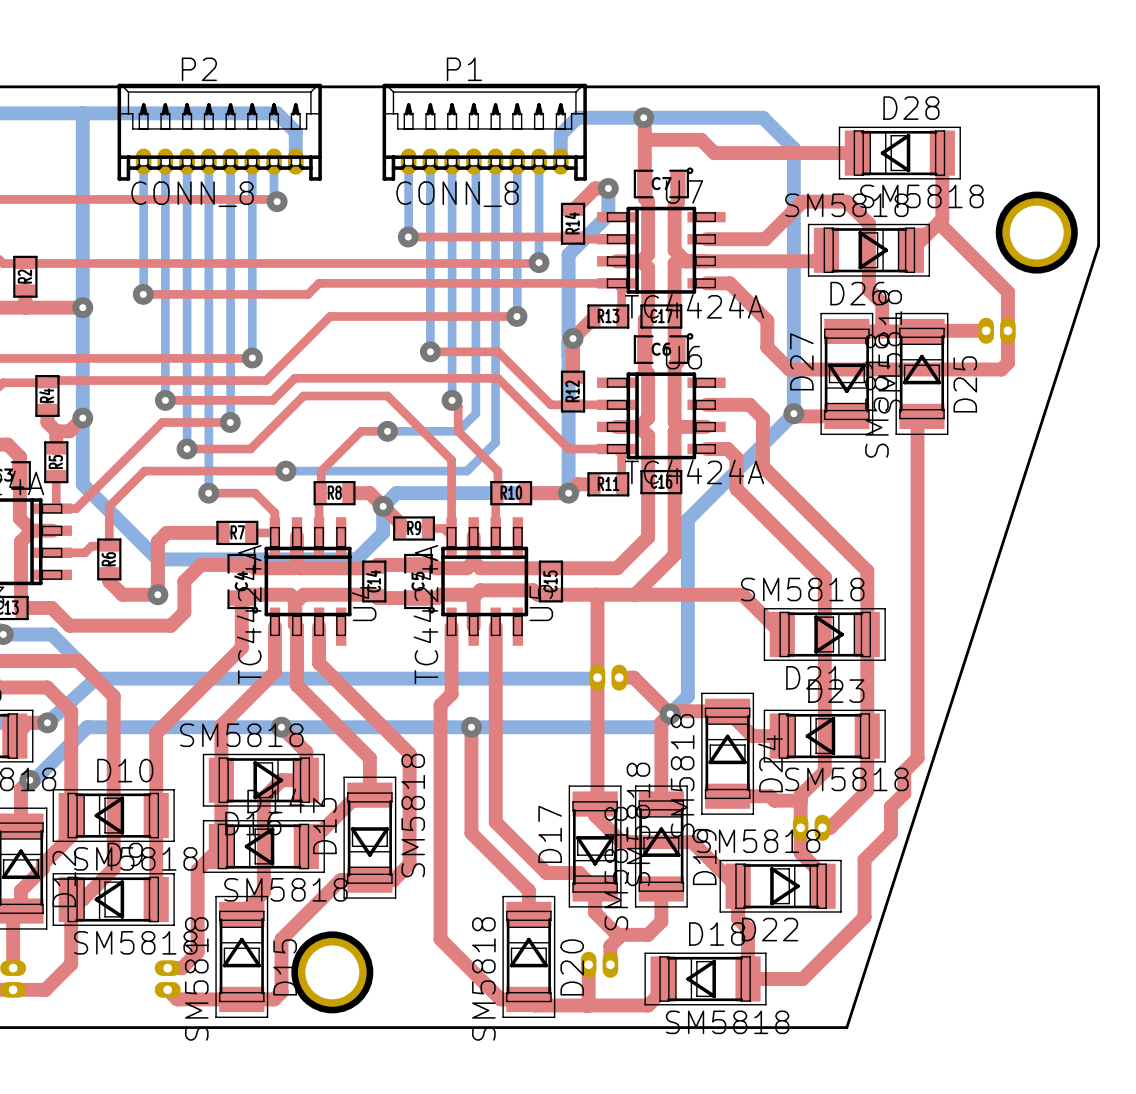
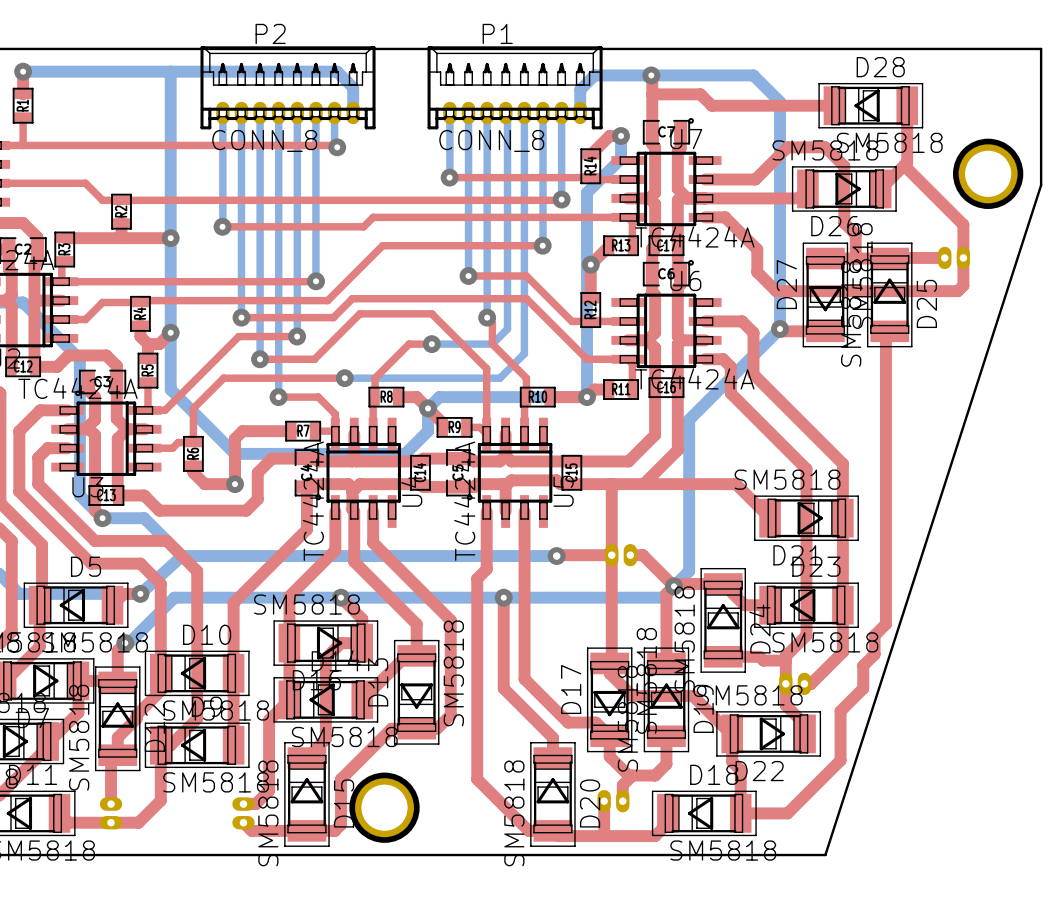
top track: none -> (611, 555) (556, 556)
bottom track: (597, 677) (533, 678) -> none
via: none -> (556, 556)

